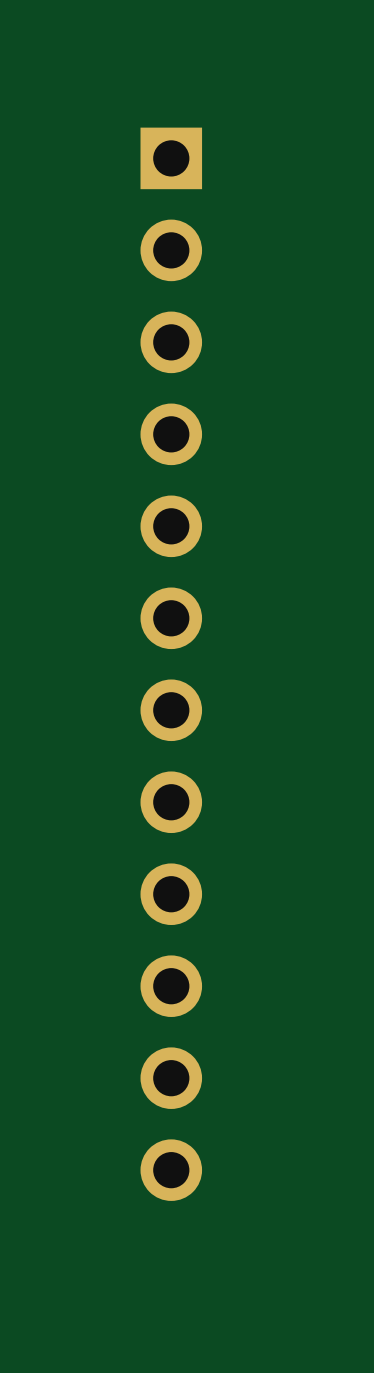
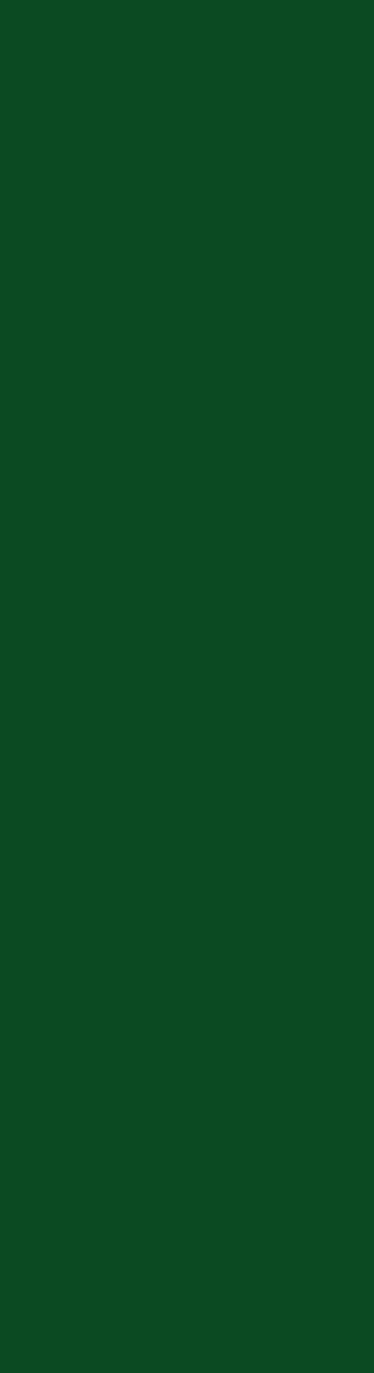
part: (171, 664) -> none

